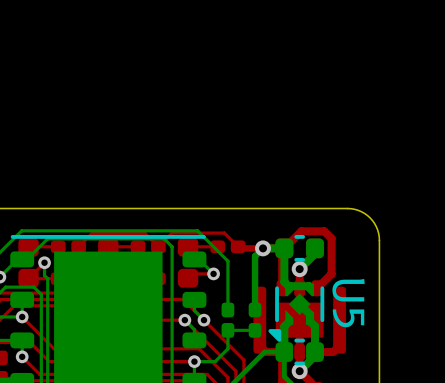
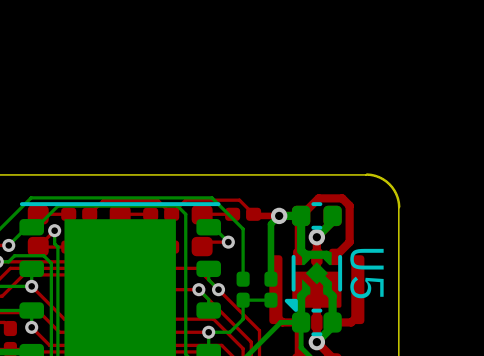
board edge: none -> (366, 174) (379, 176) (389, 183) (396, 194) (399, 206)

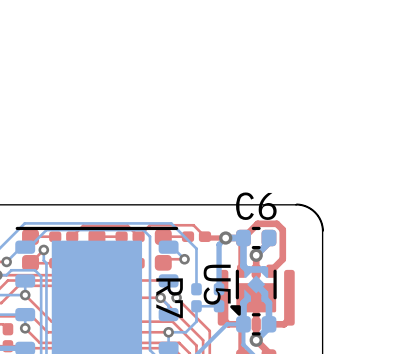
C6 name: none -> C6 (256, 206)
U5 name position: U5 (366, 273) -> U5 (217, 284)
R7 name: none -> R7 (169, 298)

